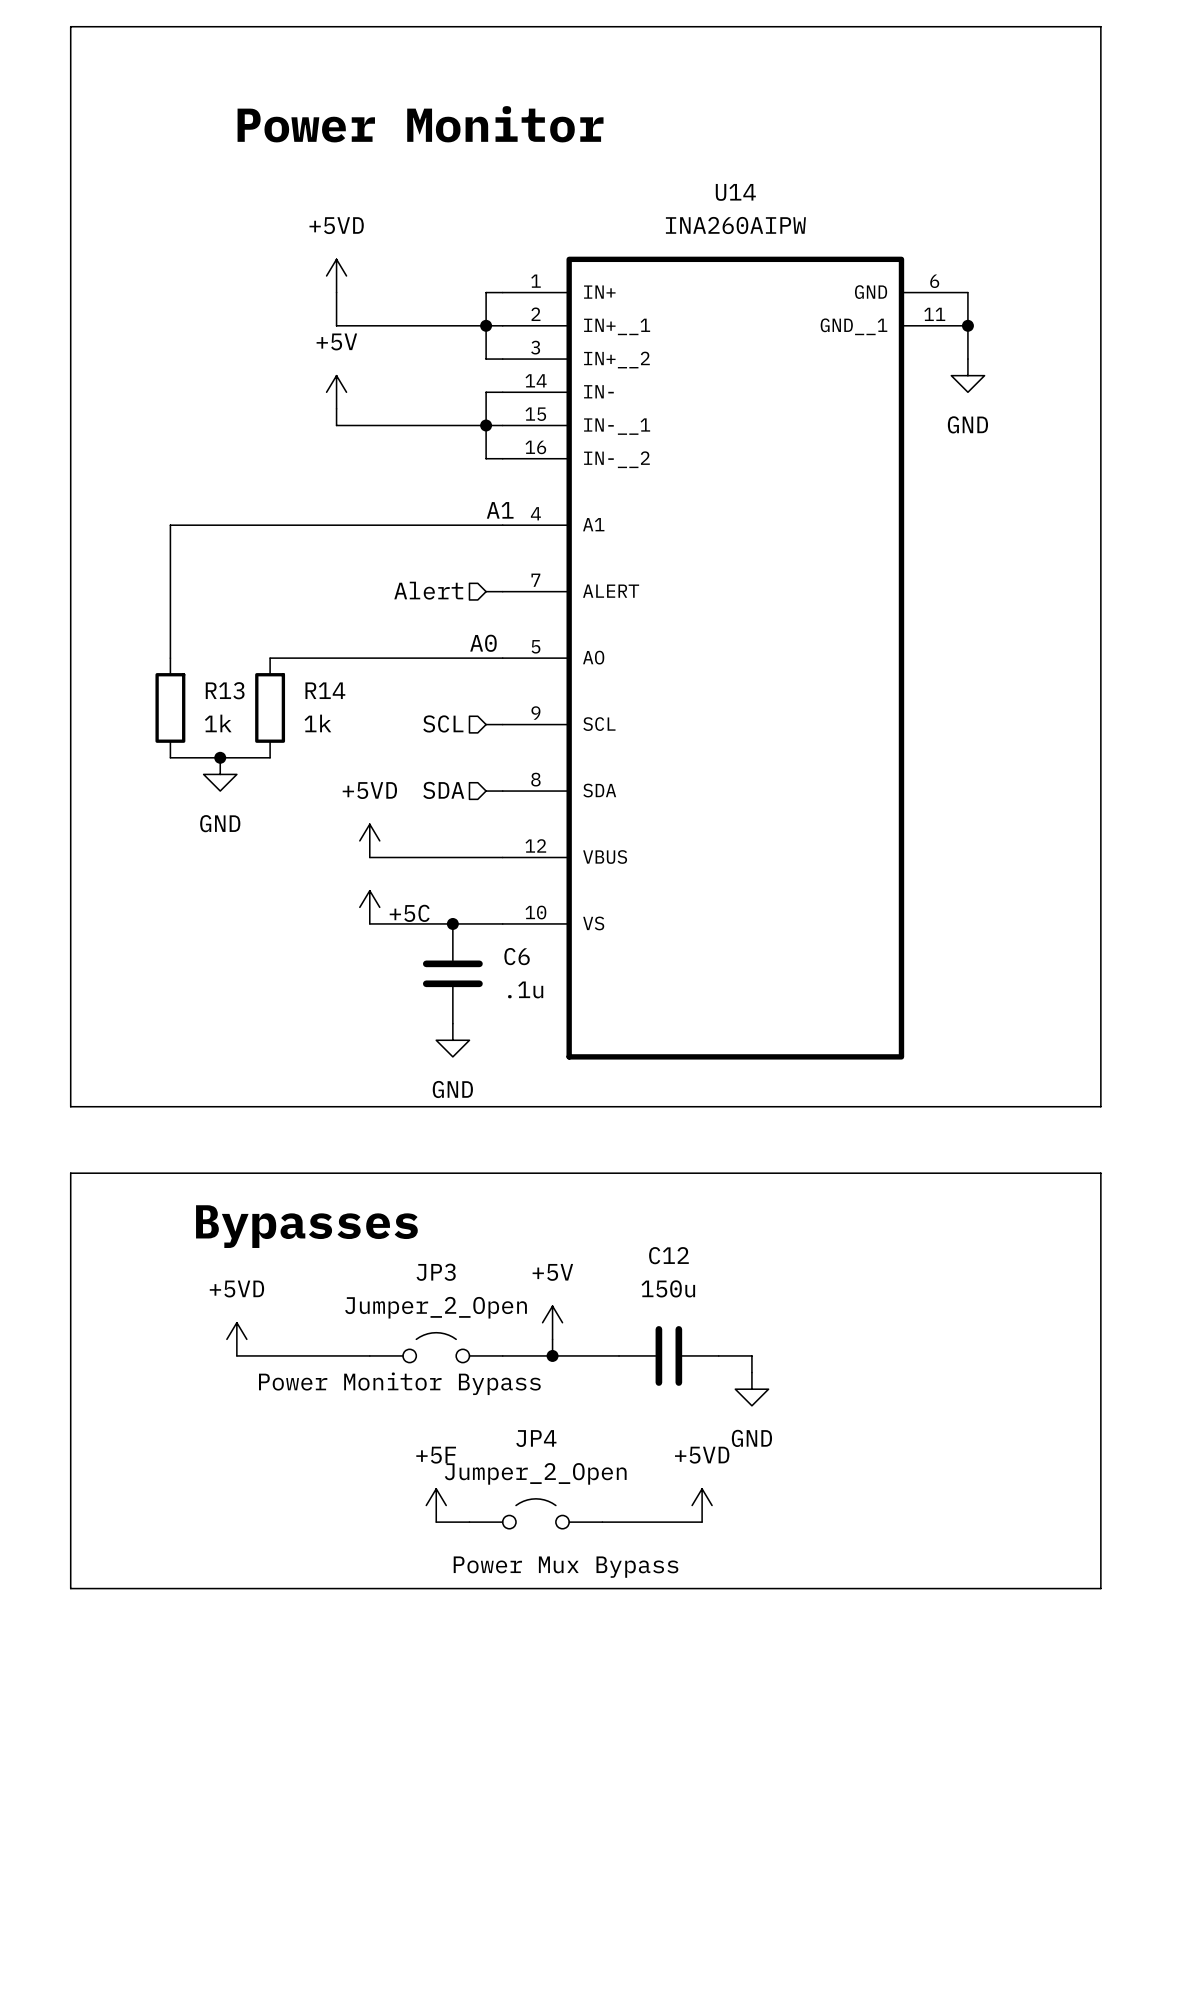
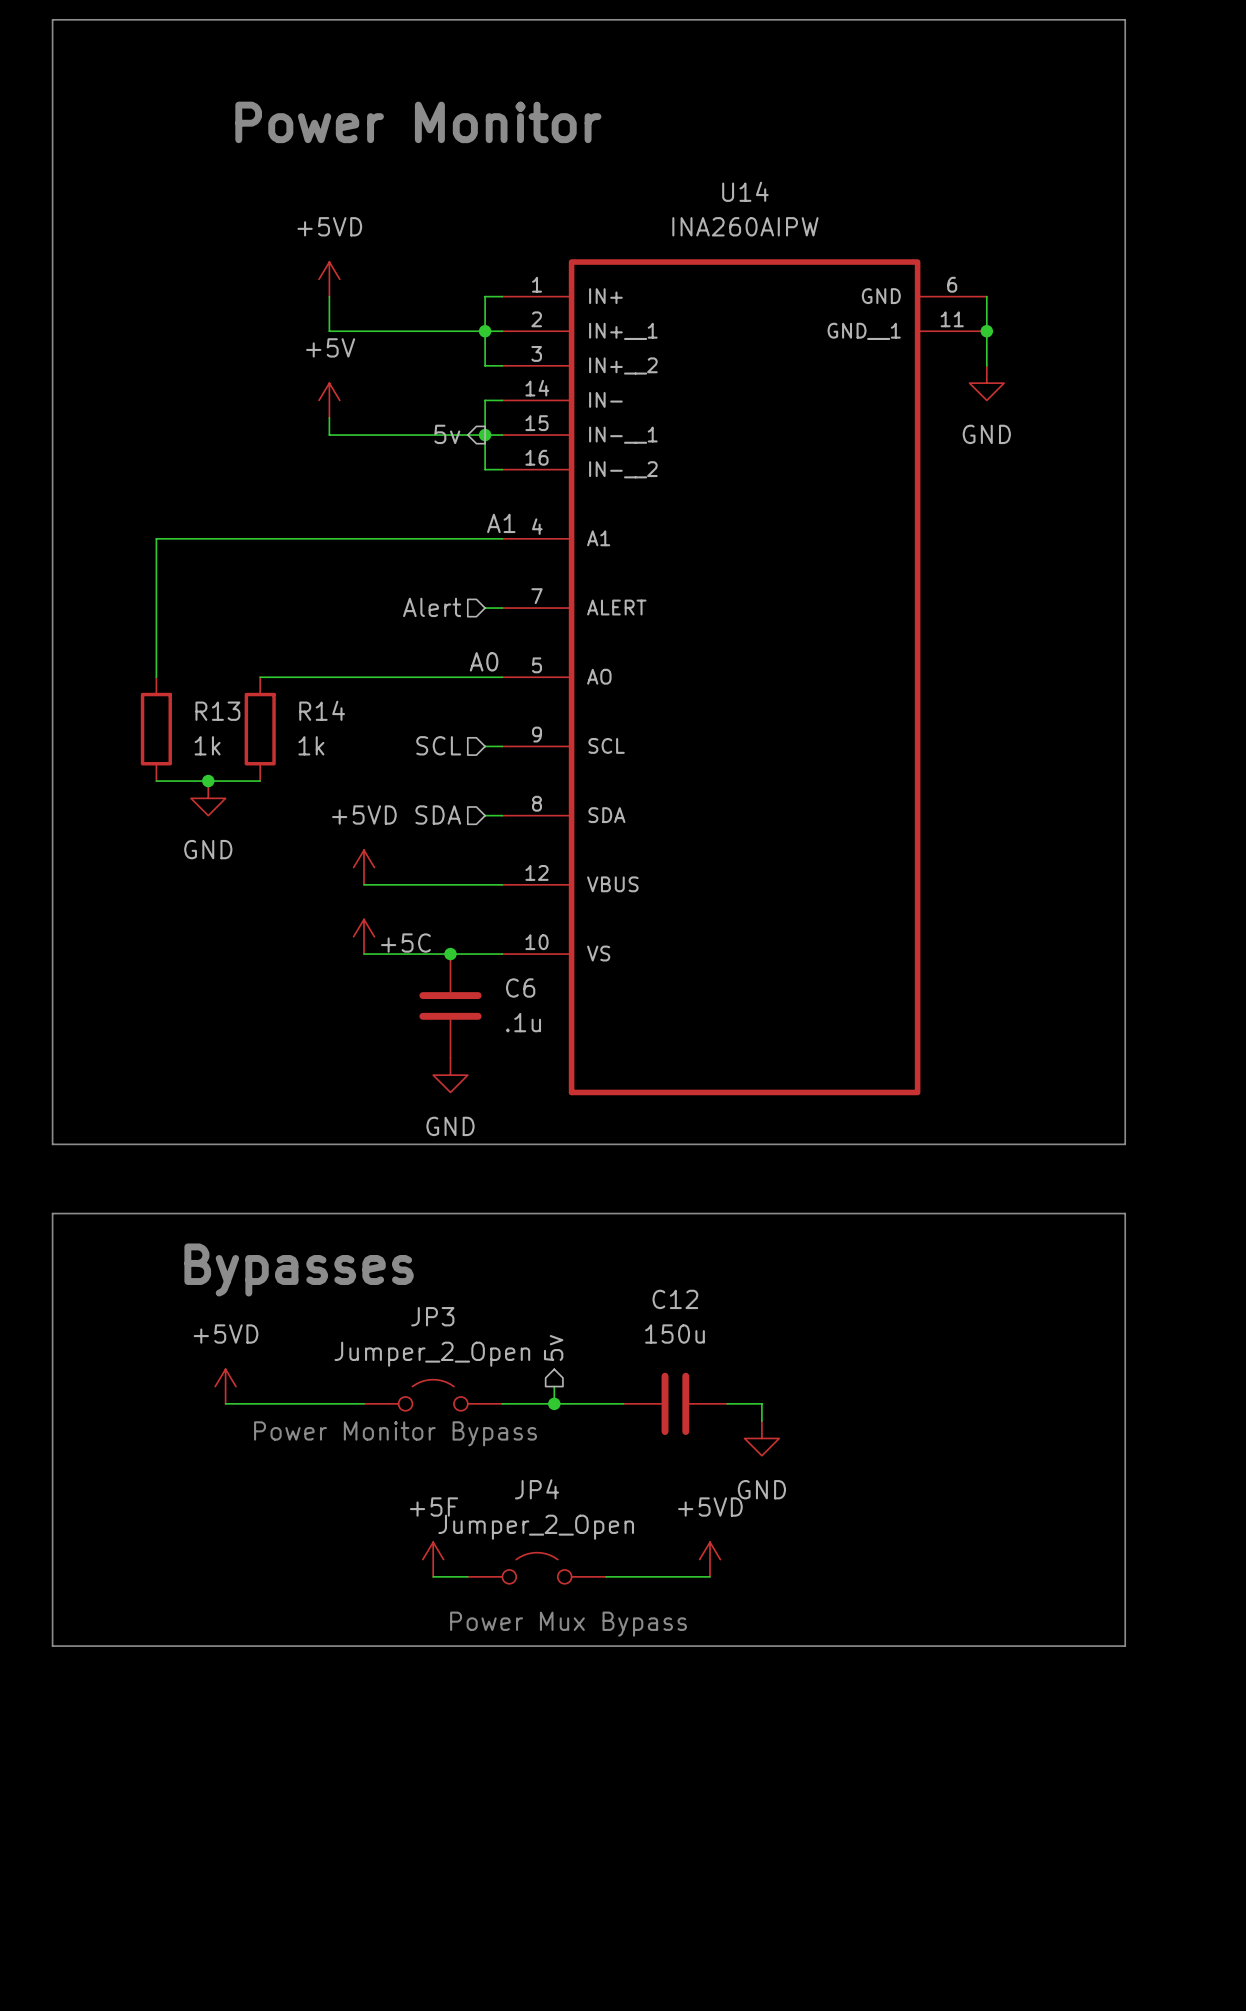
hierarchical label: none -> 5v (447, 434)
hierarchical label: none -> 5v (553, 1347)
power symbol: +5V (552, 1322) -> none

